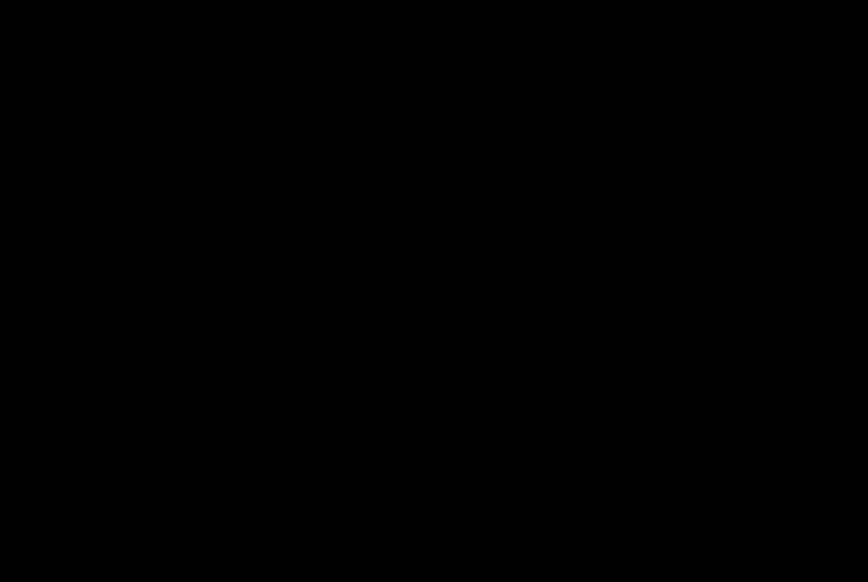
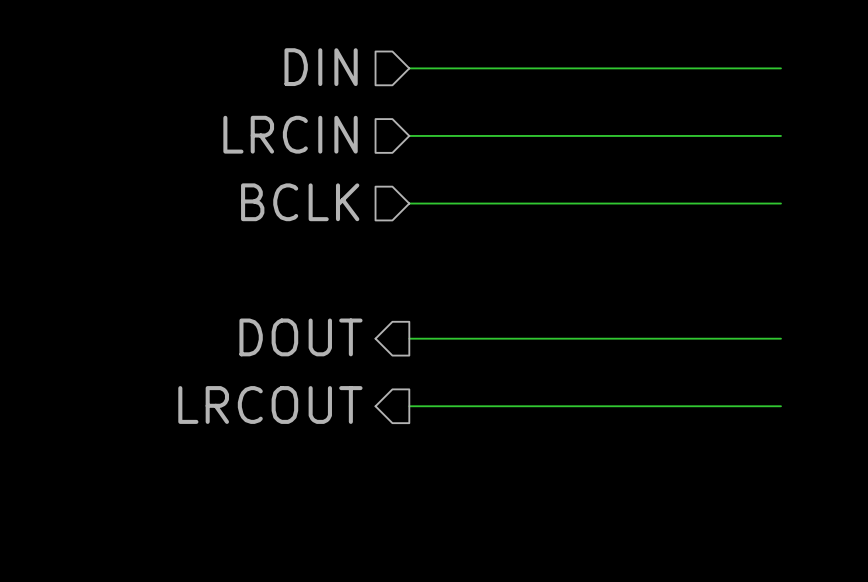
hierarchical label: none -> DIN (321, 67)
wire: none -> (409, 68) (780, 68)
hierarchical label: none -> LRCIN (290, 134)
wire: none -> (409, 135) (780, 135)
hierarchical label: none -> BCLK (300, 202)
wire: none -> (409, 203) (780, 203)
hierarchical label: none -> DOUT (300, 337)
wire: none -> (409, 338) (780, 338)
hierarchical label: none -> LRCOUT (270, 405)
wire: none -> (409, 406) (780, 406)

